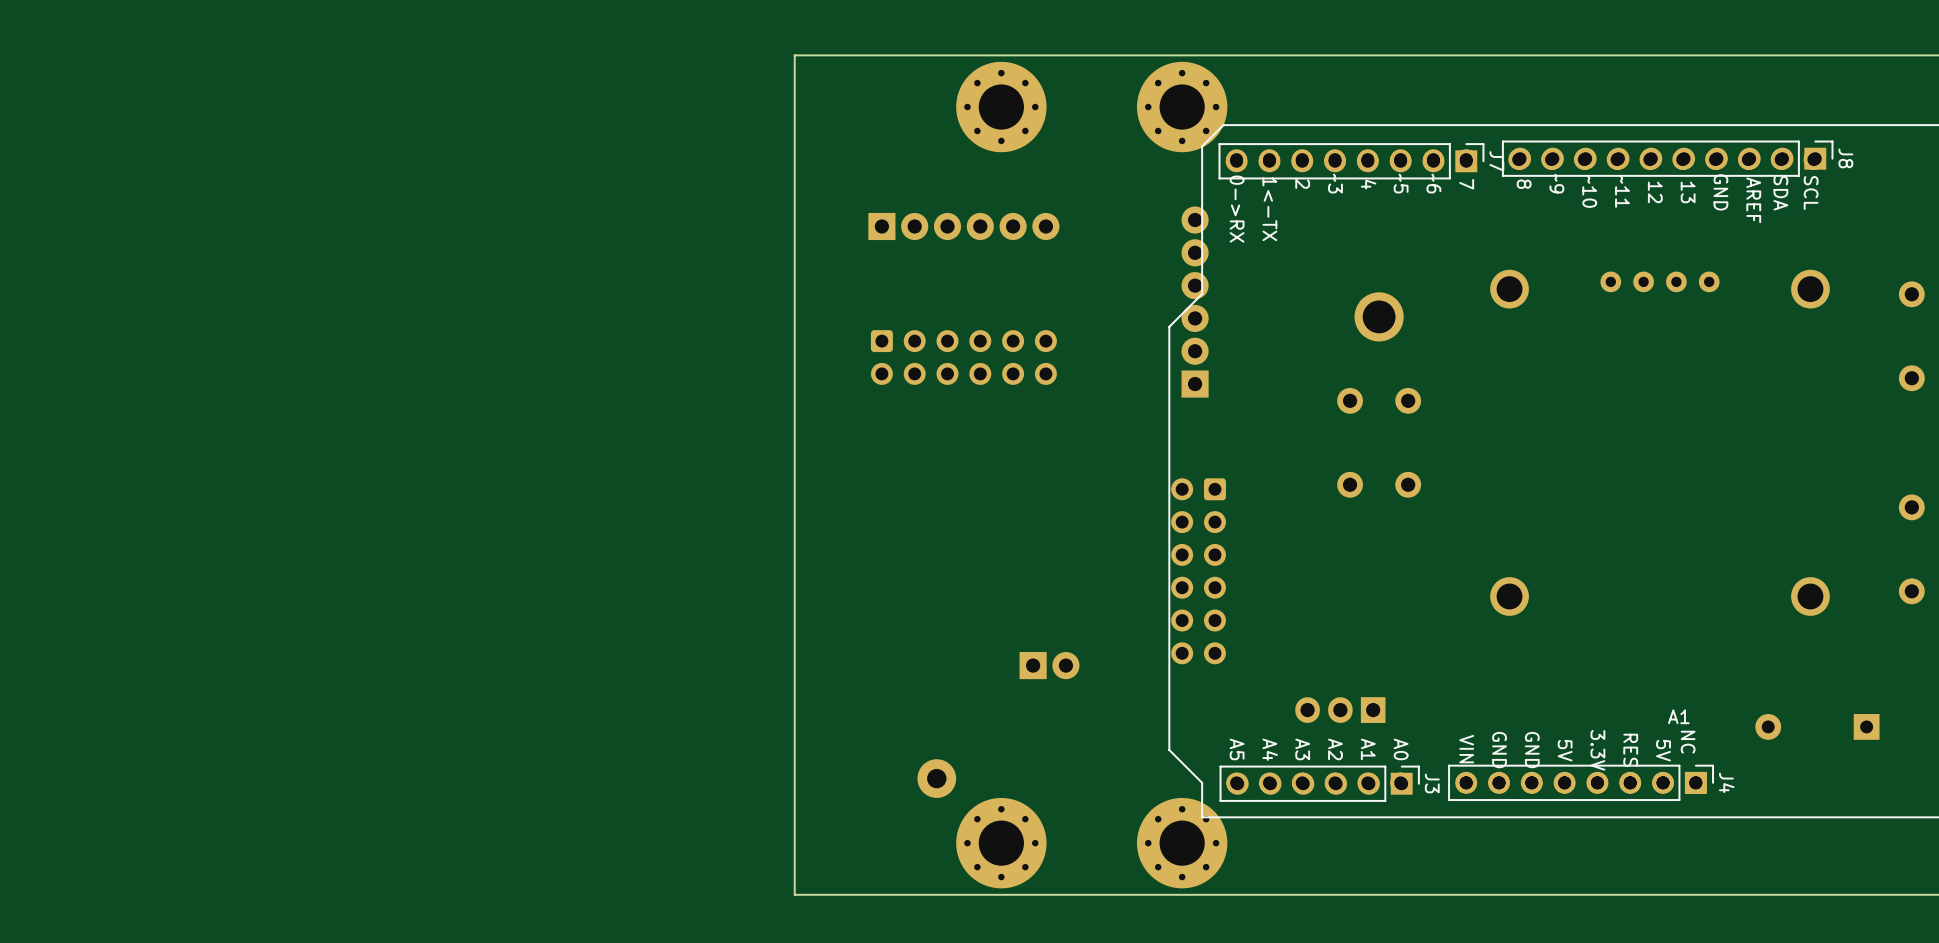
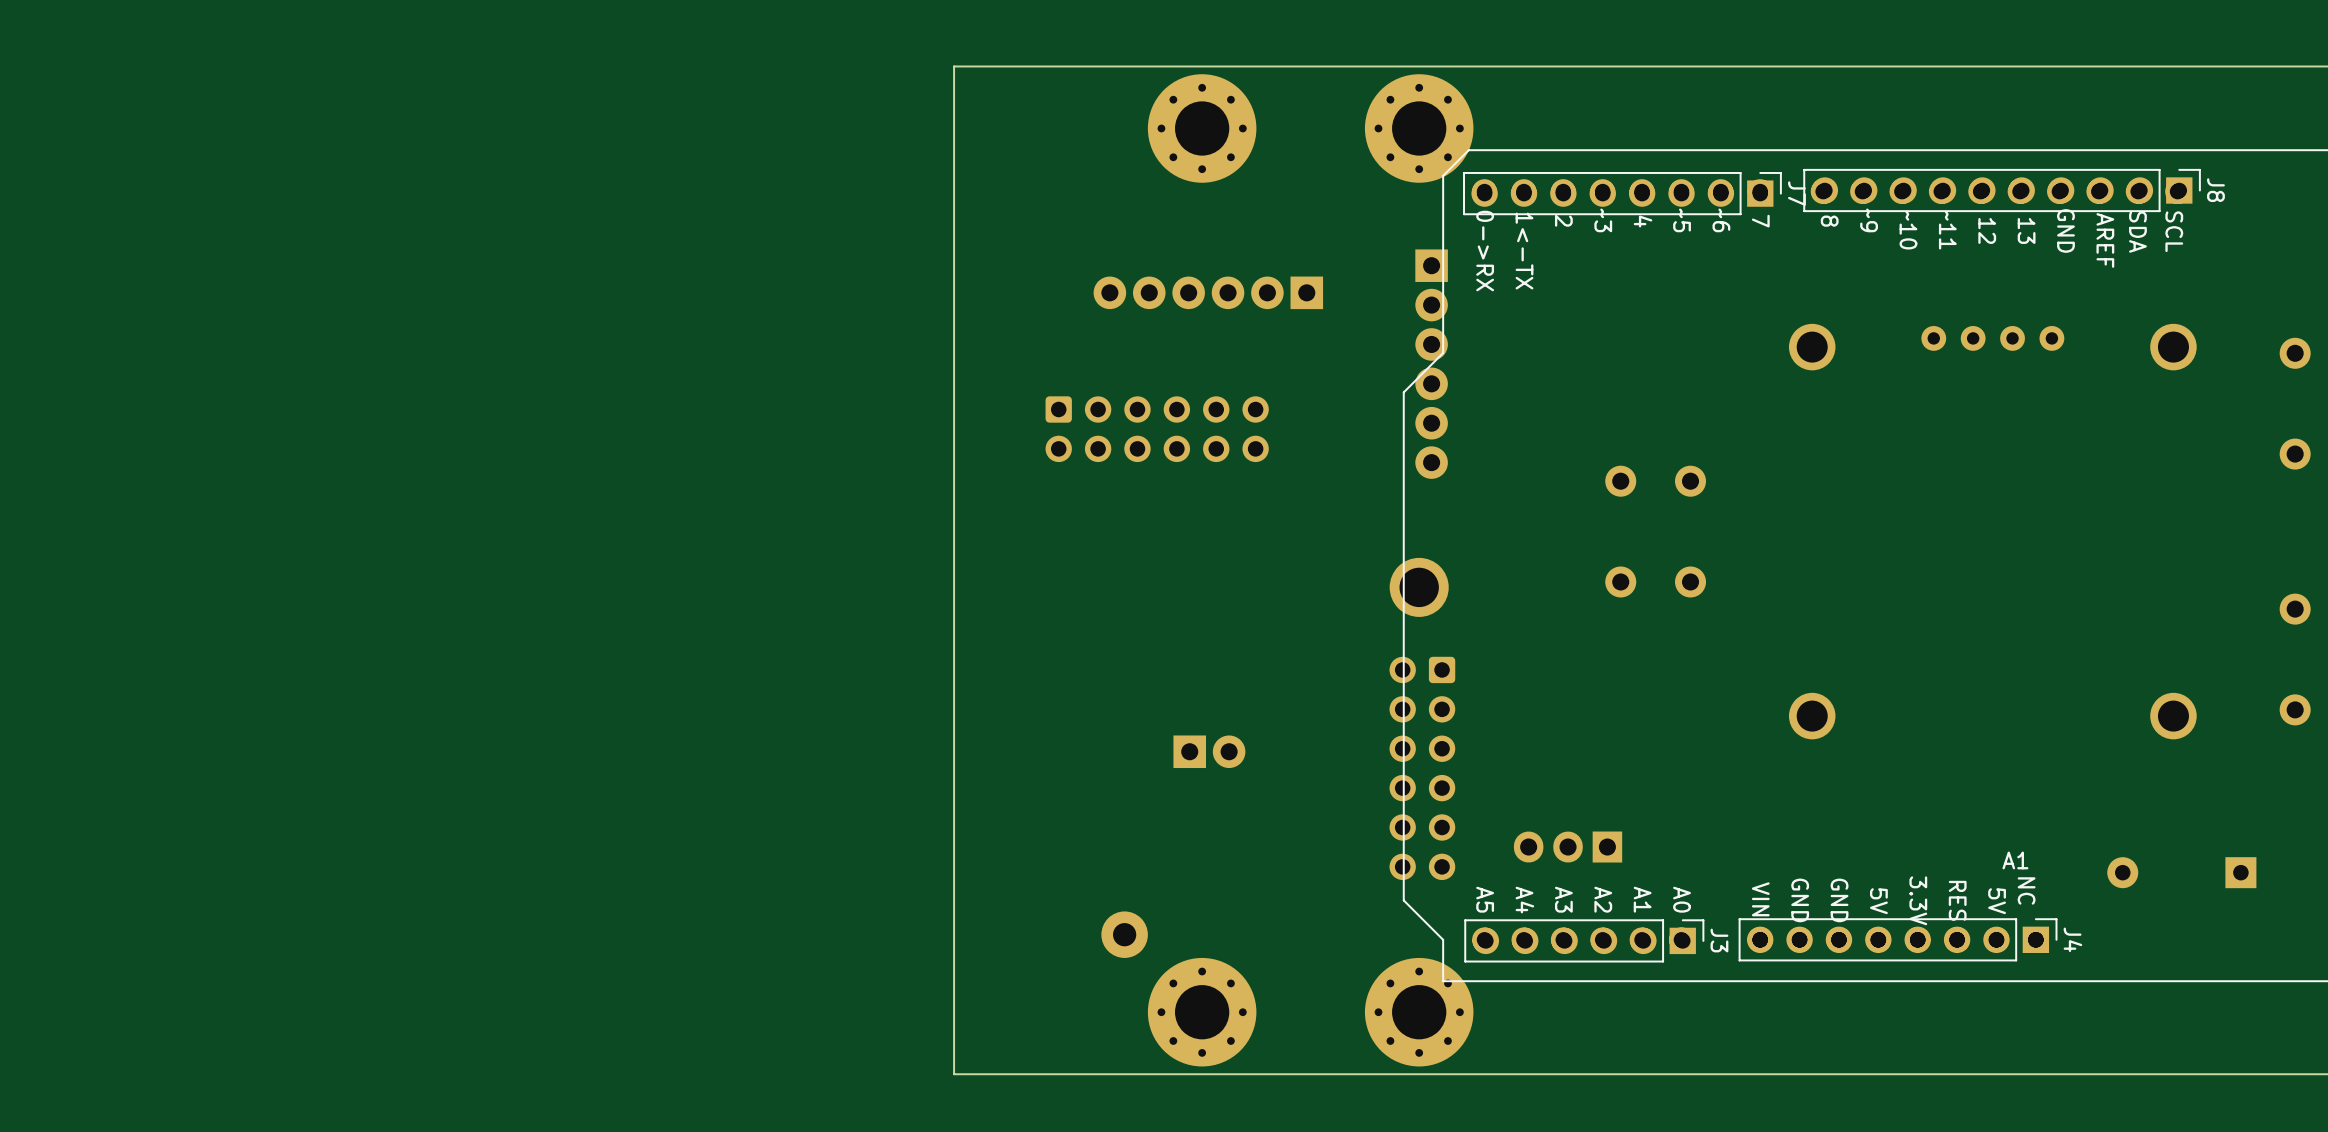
part rotation: 0° (963, 226) -> 180° (1208, 292)
part rotation: 0° (1195, 302) -> 180° (1431, 364)
part position: (1379, 316) -> (1419, 587)
part position: (1198, 571) -> (1422, 768)
part position: (1049, 665) -> (1209, 751)
part position: (1340, 710) -> (1568, 847)

